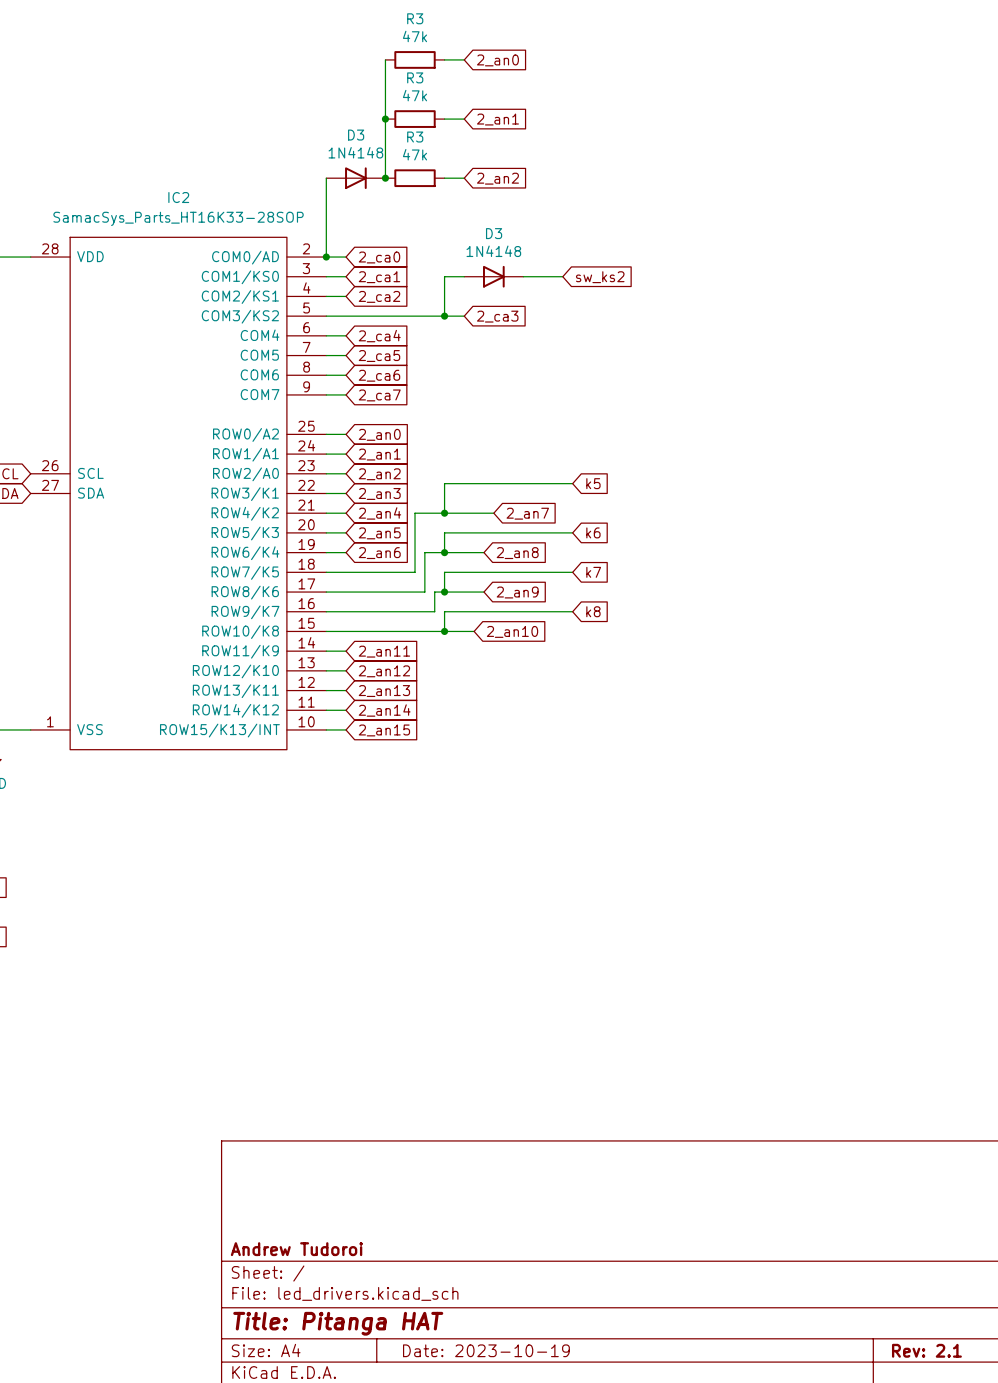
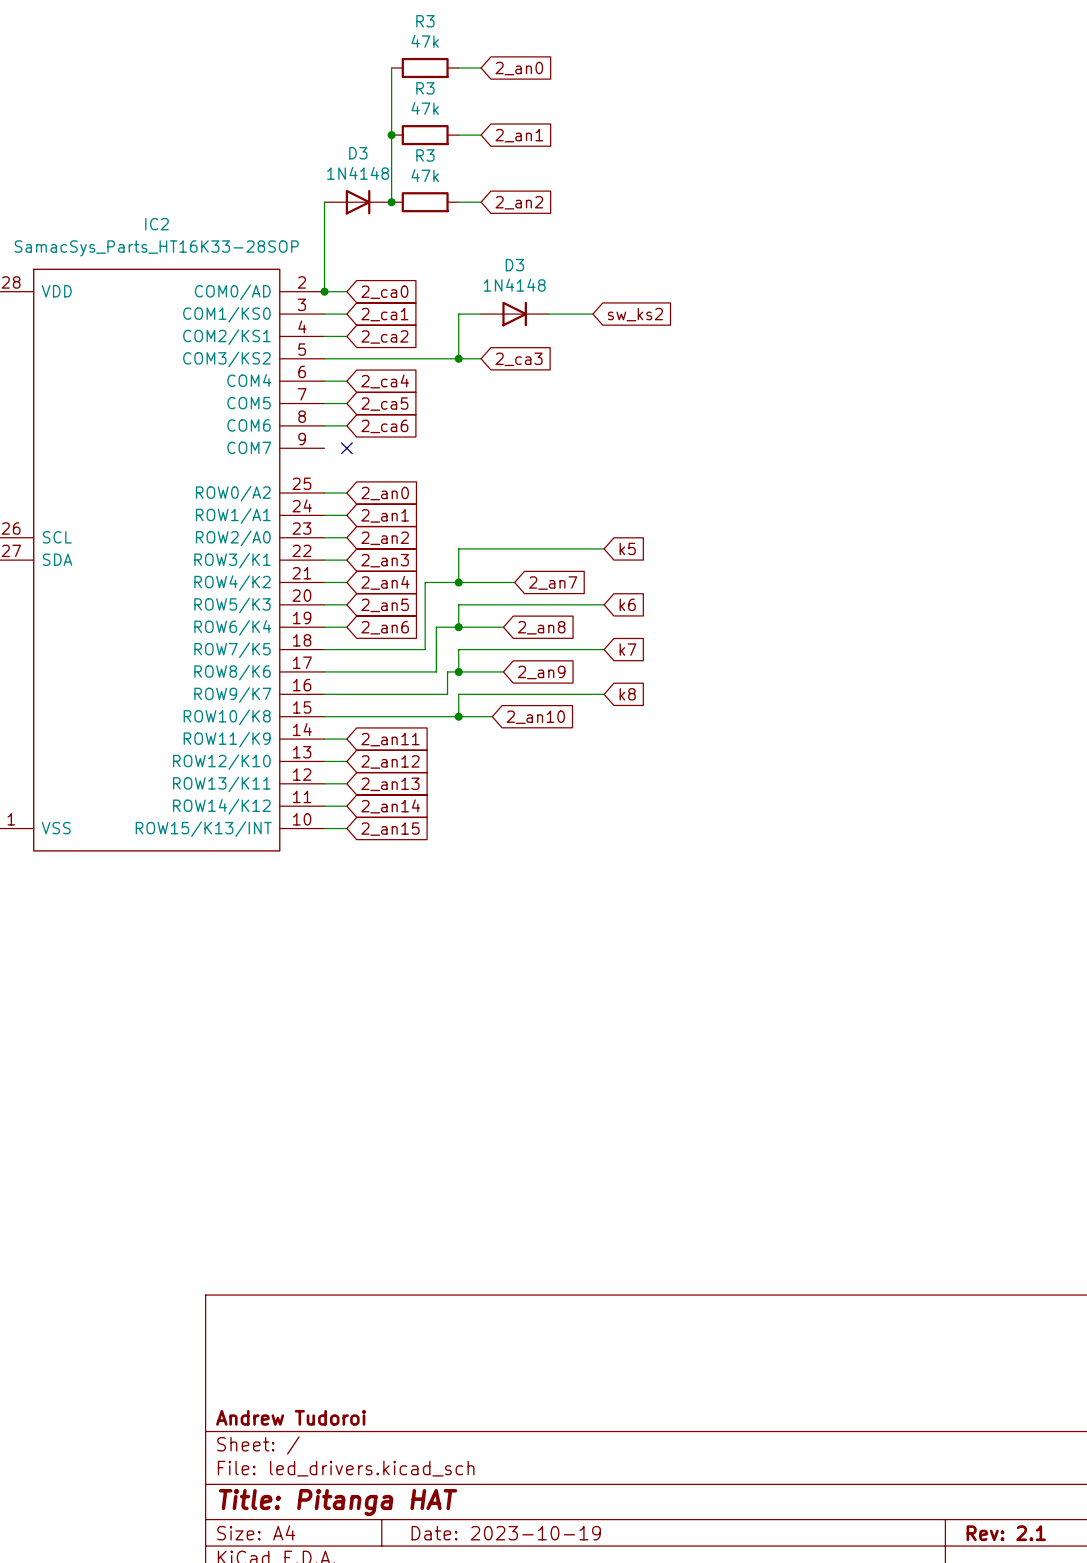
wire: (326, 394) (346, 394) -> none
no-connect mark: none -> (346, 448)
global label: 2_ca7 (379, 395) -> none

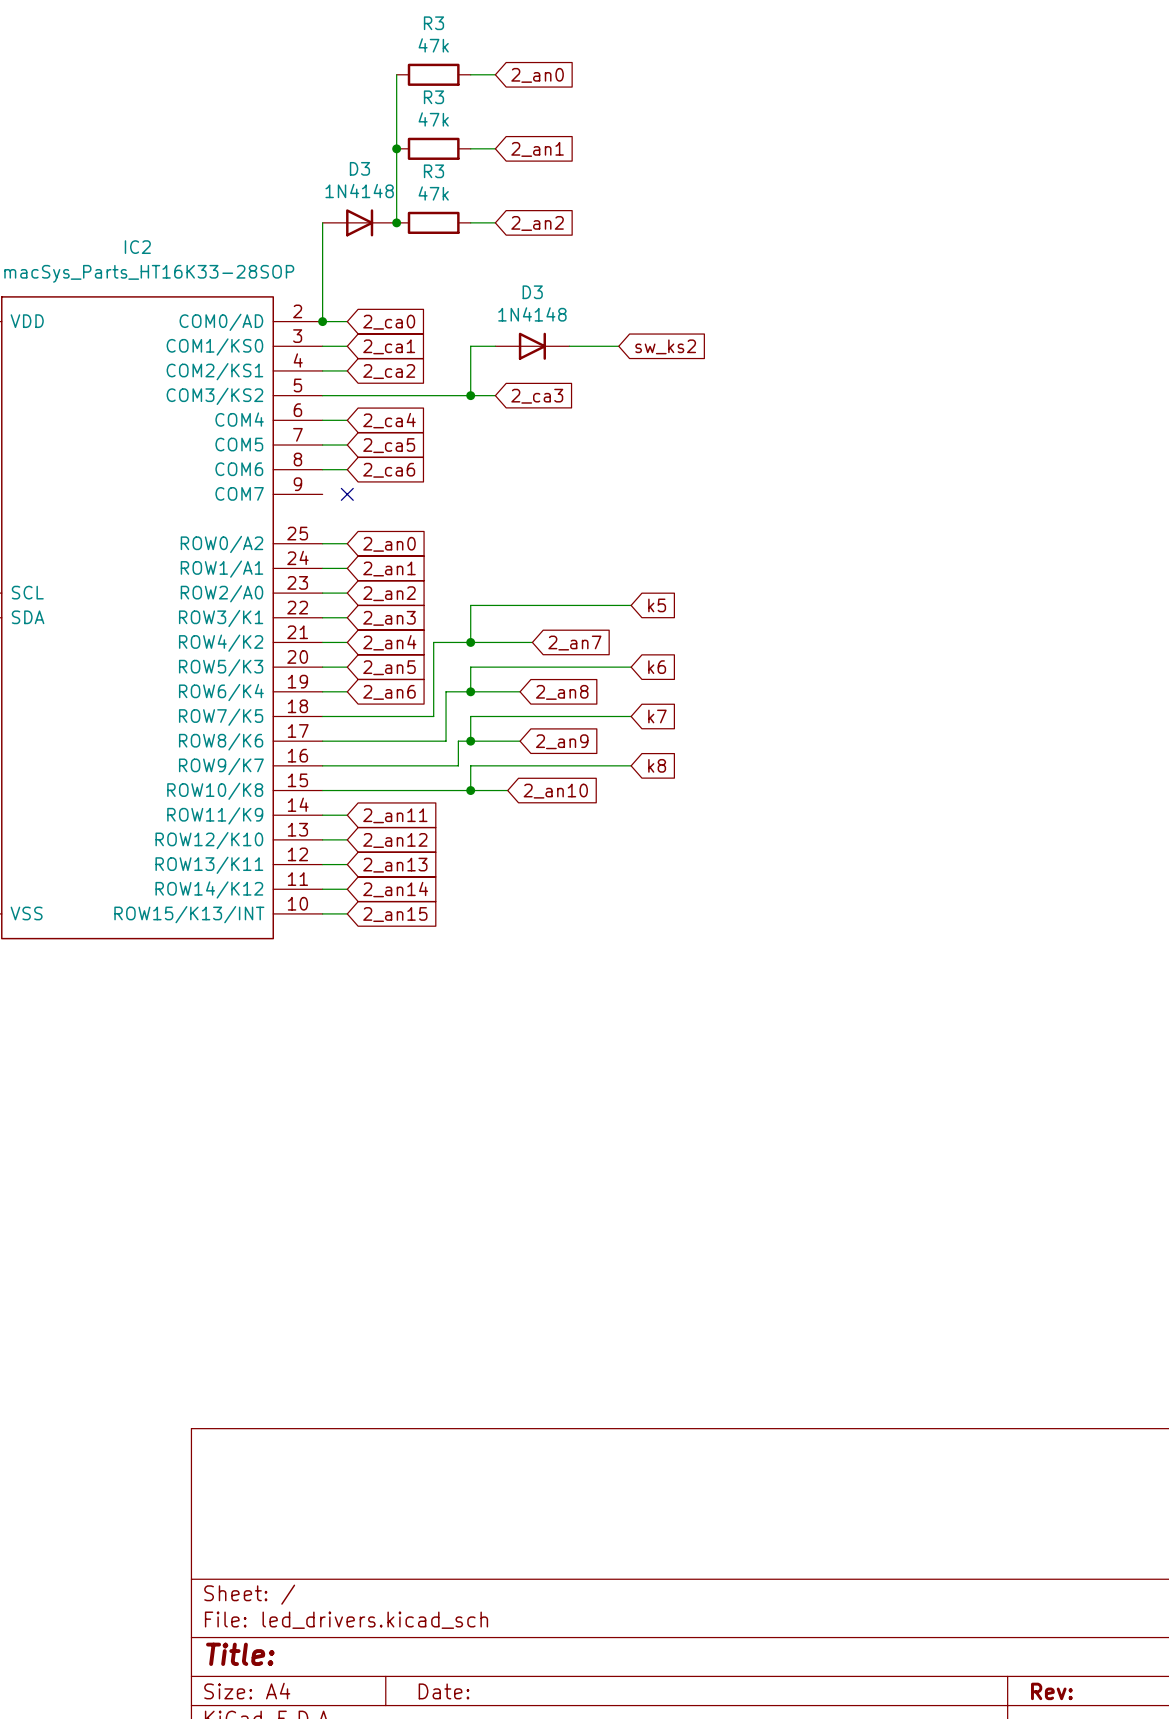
title block: Andrew Tudoroi (291, 1417) -> none
title block: Title: Pitanga HAT (338, 1502) -> Title: (240, 1654)
title block: Date: 2023-10-19 (506, 1533) -> Date: (444, 1691)
title block: Rev: 2.1 (1006, 1533) -> Rev: (1051, 1691)

